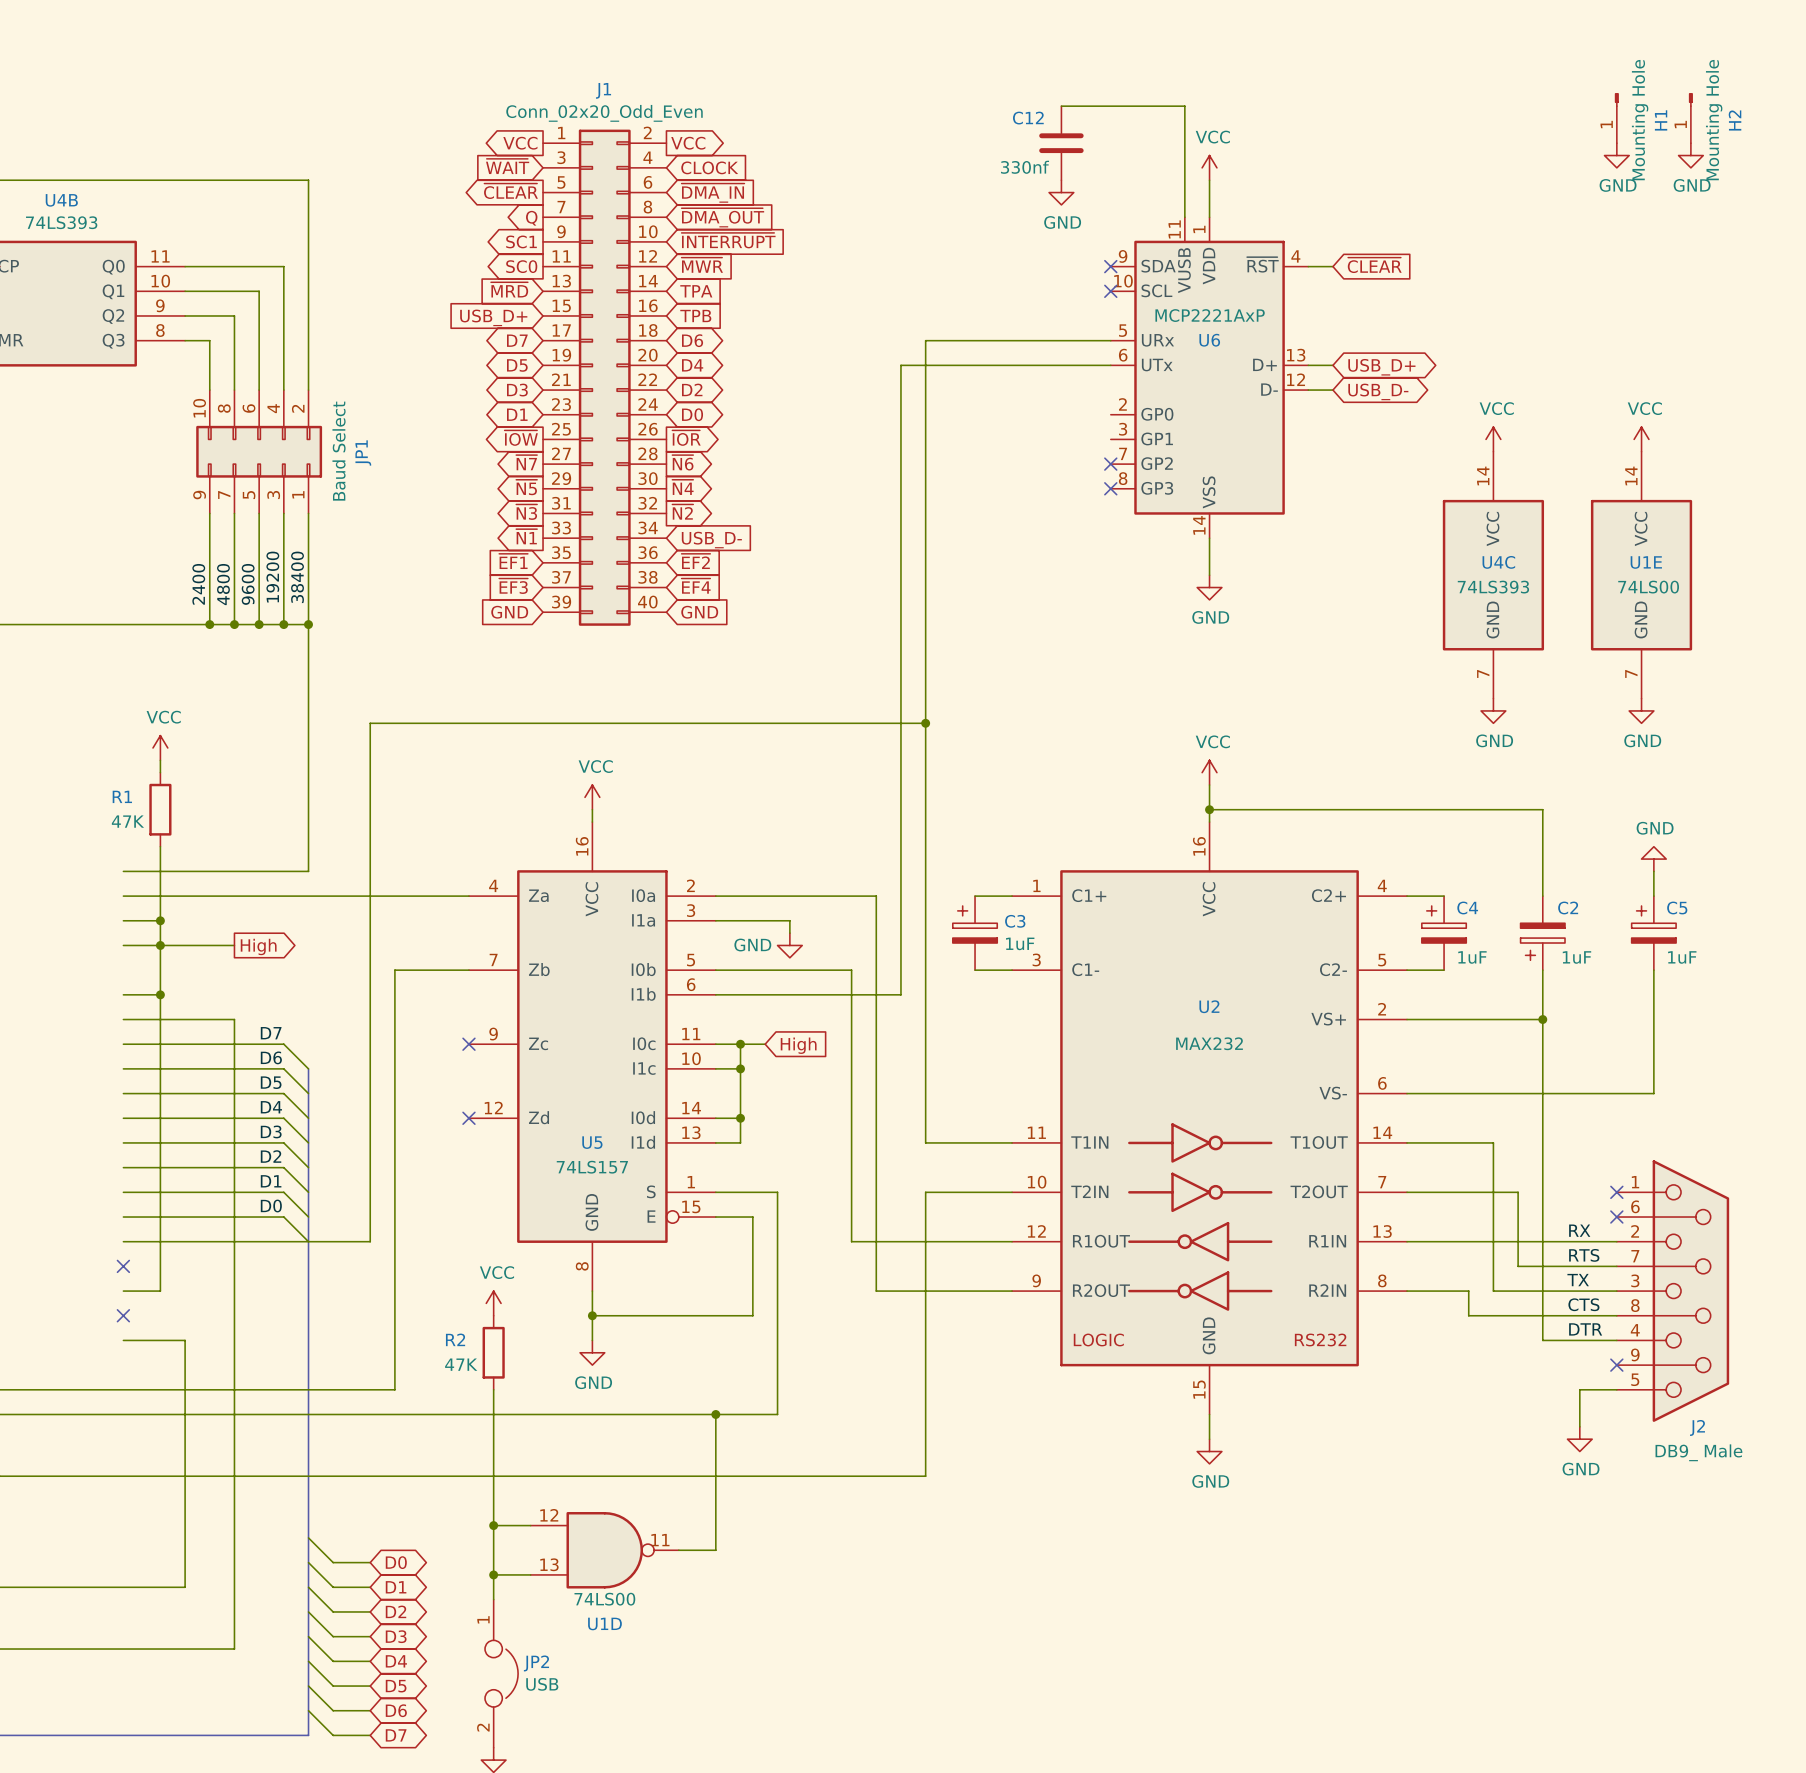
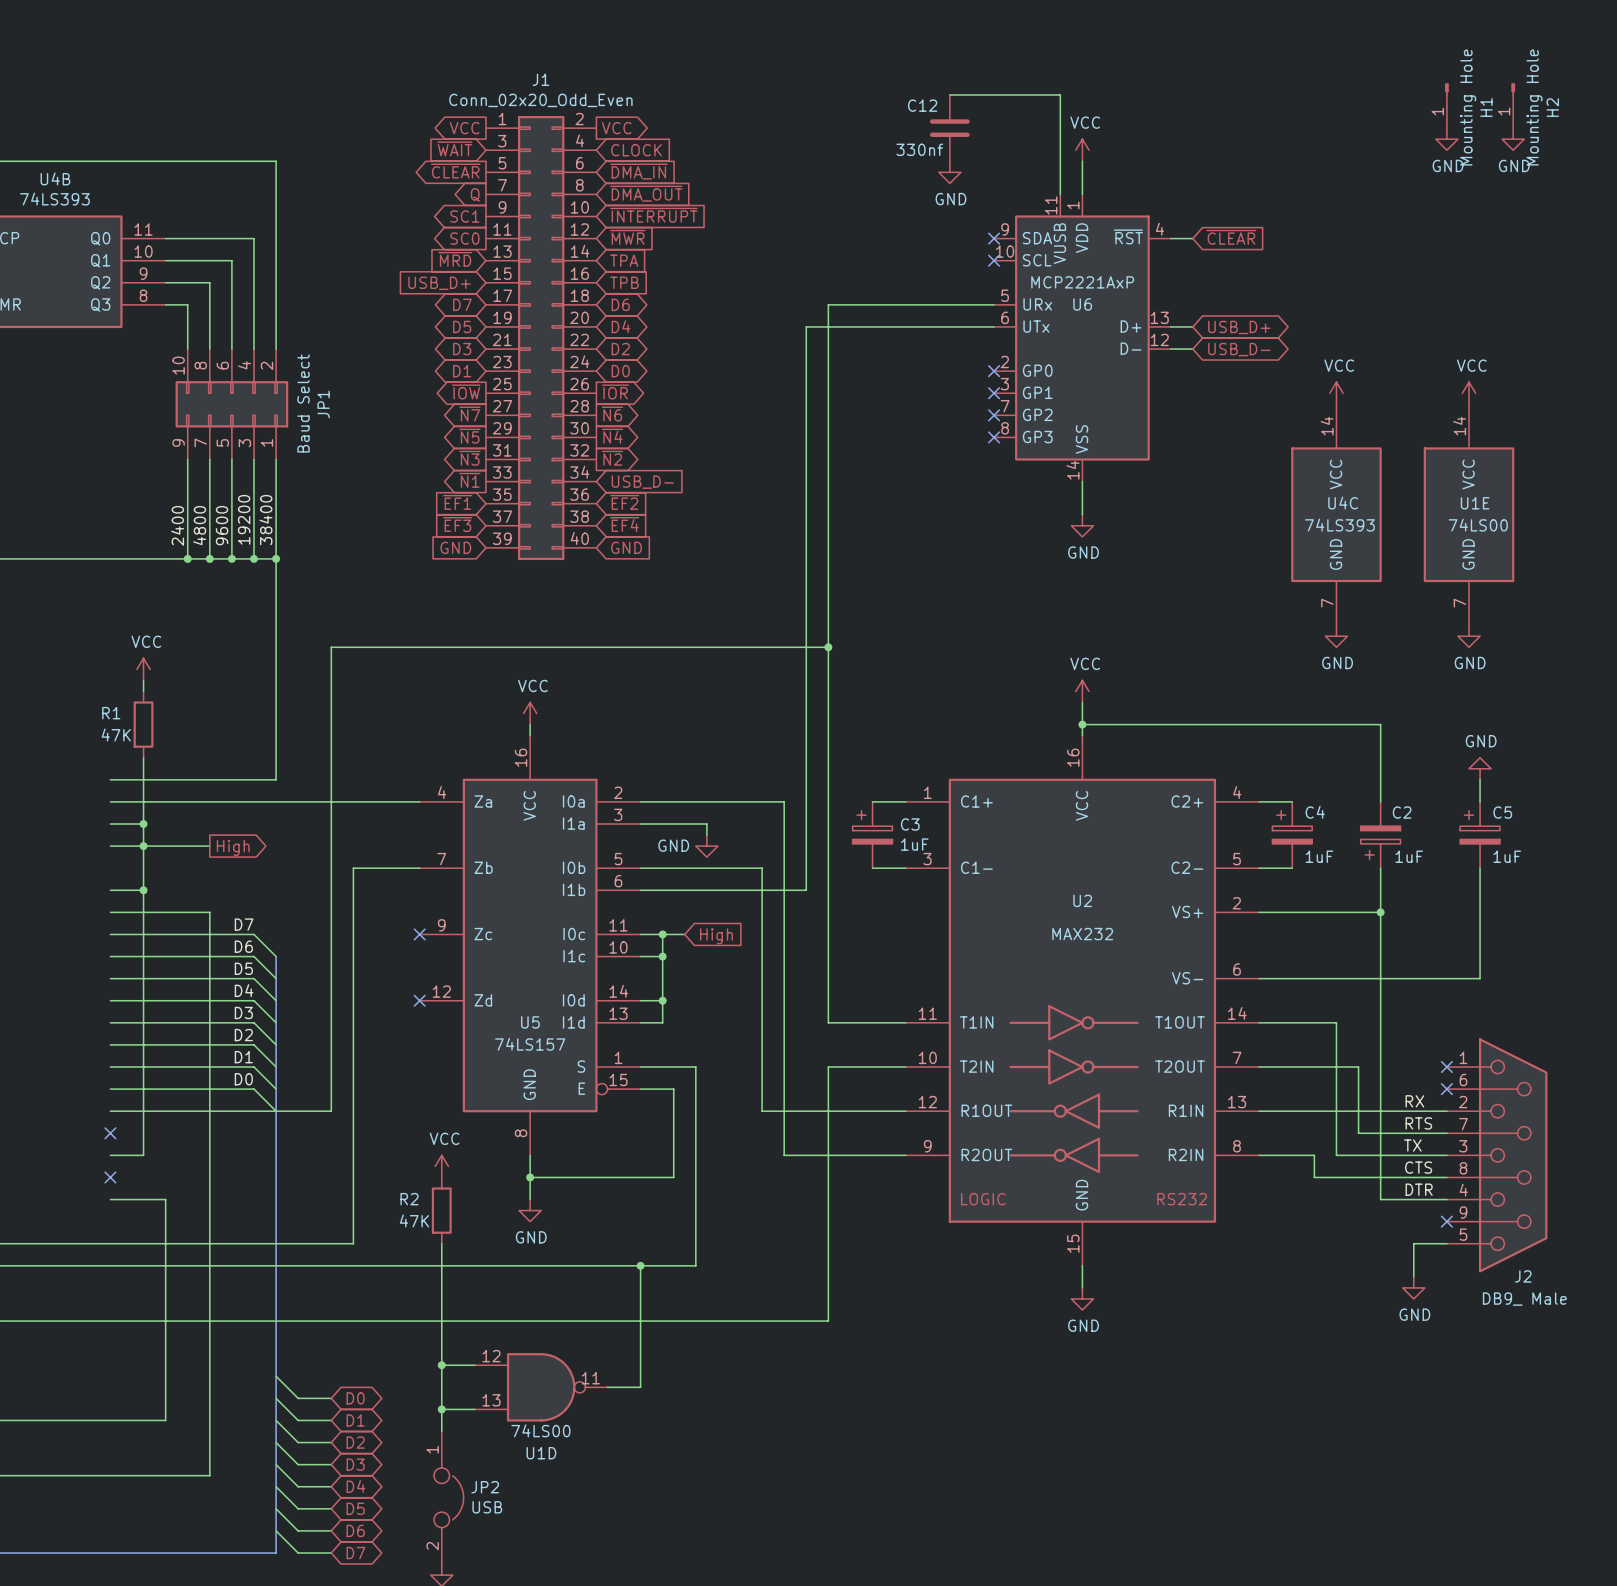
no-connect mark: none -> (994, 371)
no-connect mark: none -> (994, 393)

